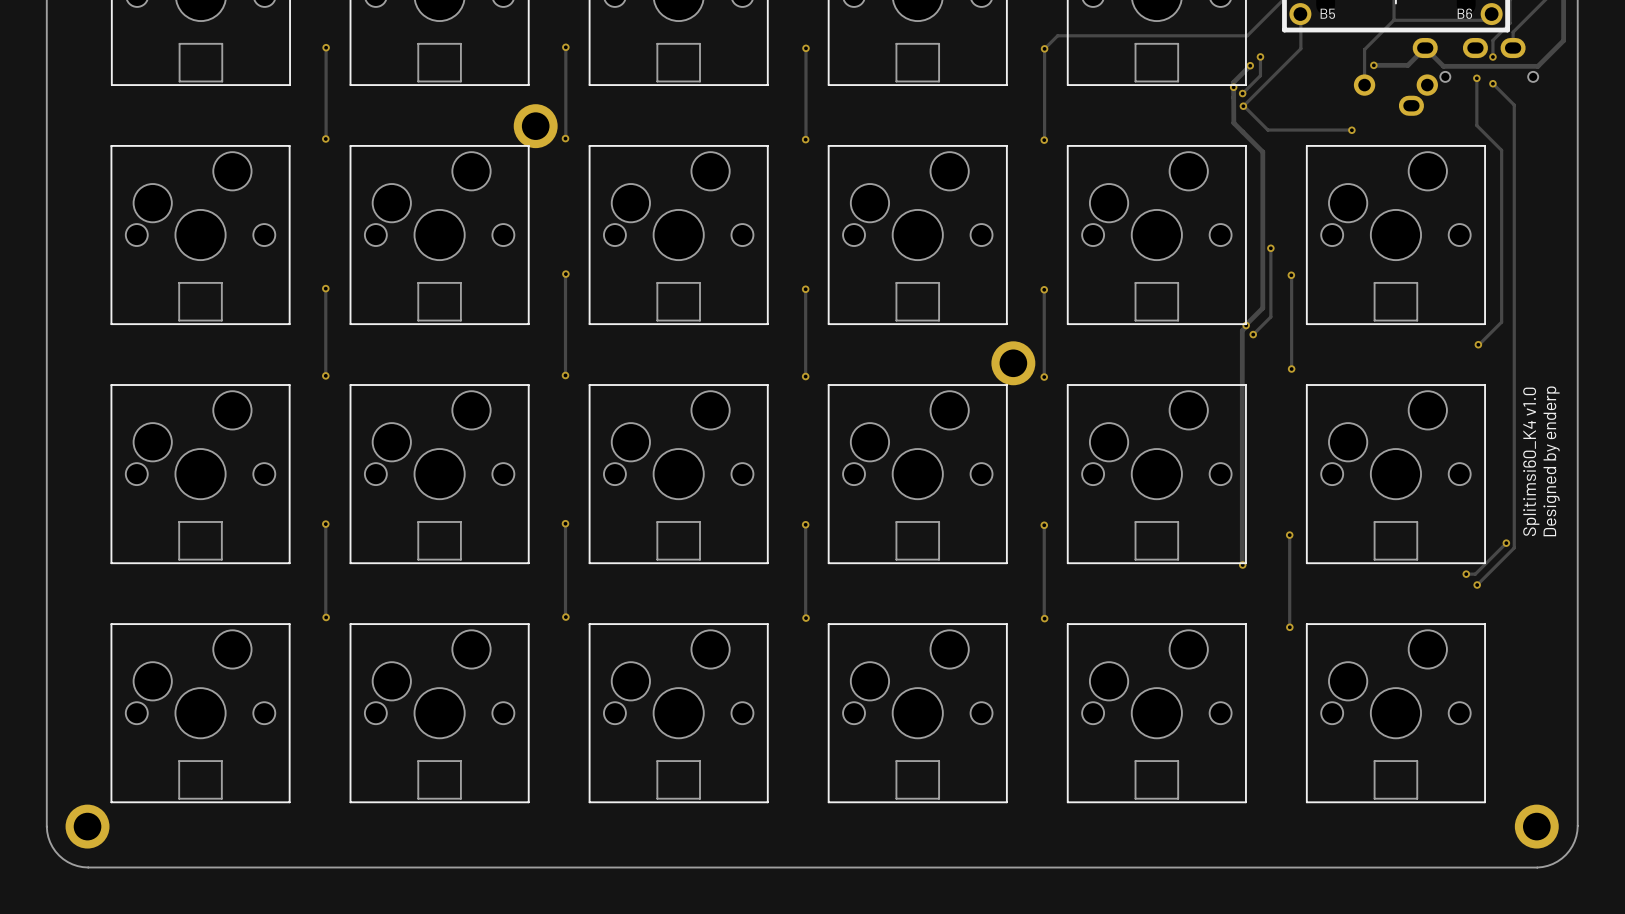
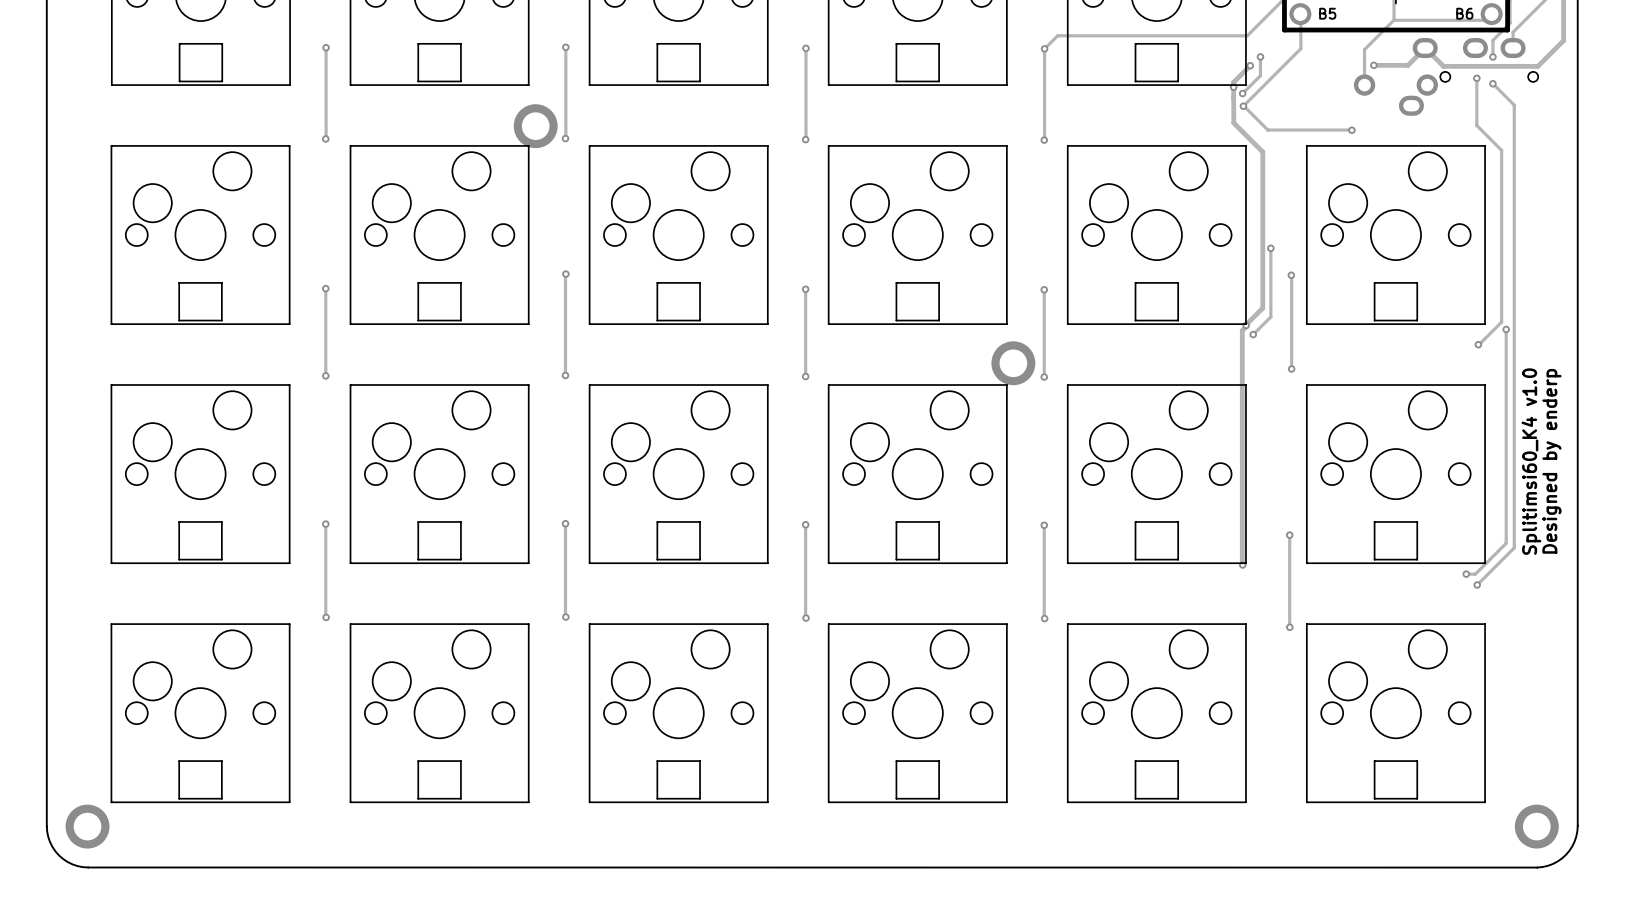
track: none -> (1506, 329) (1506, 543)
via: none -> (1506, 329)
via: (1506, 543) -> none

